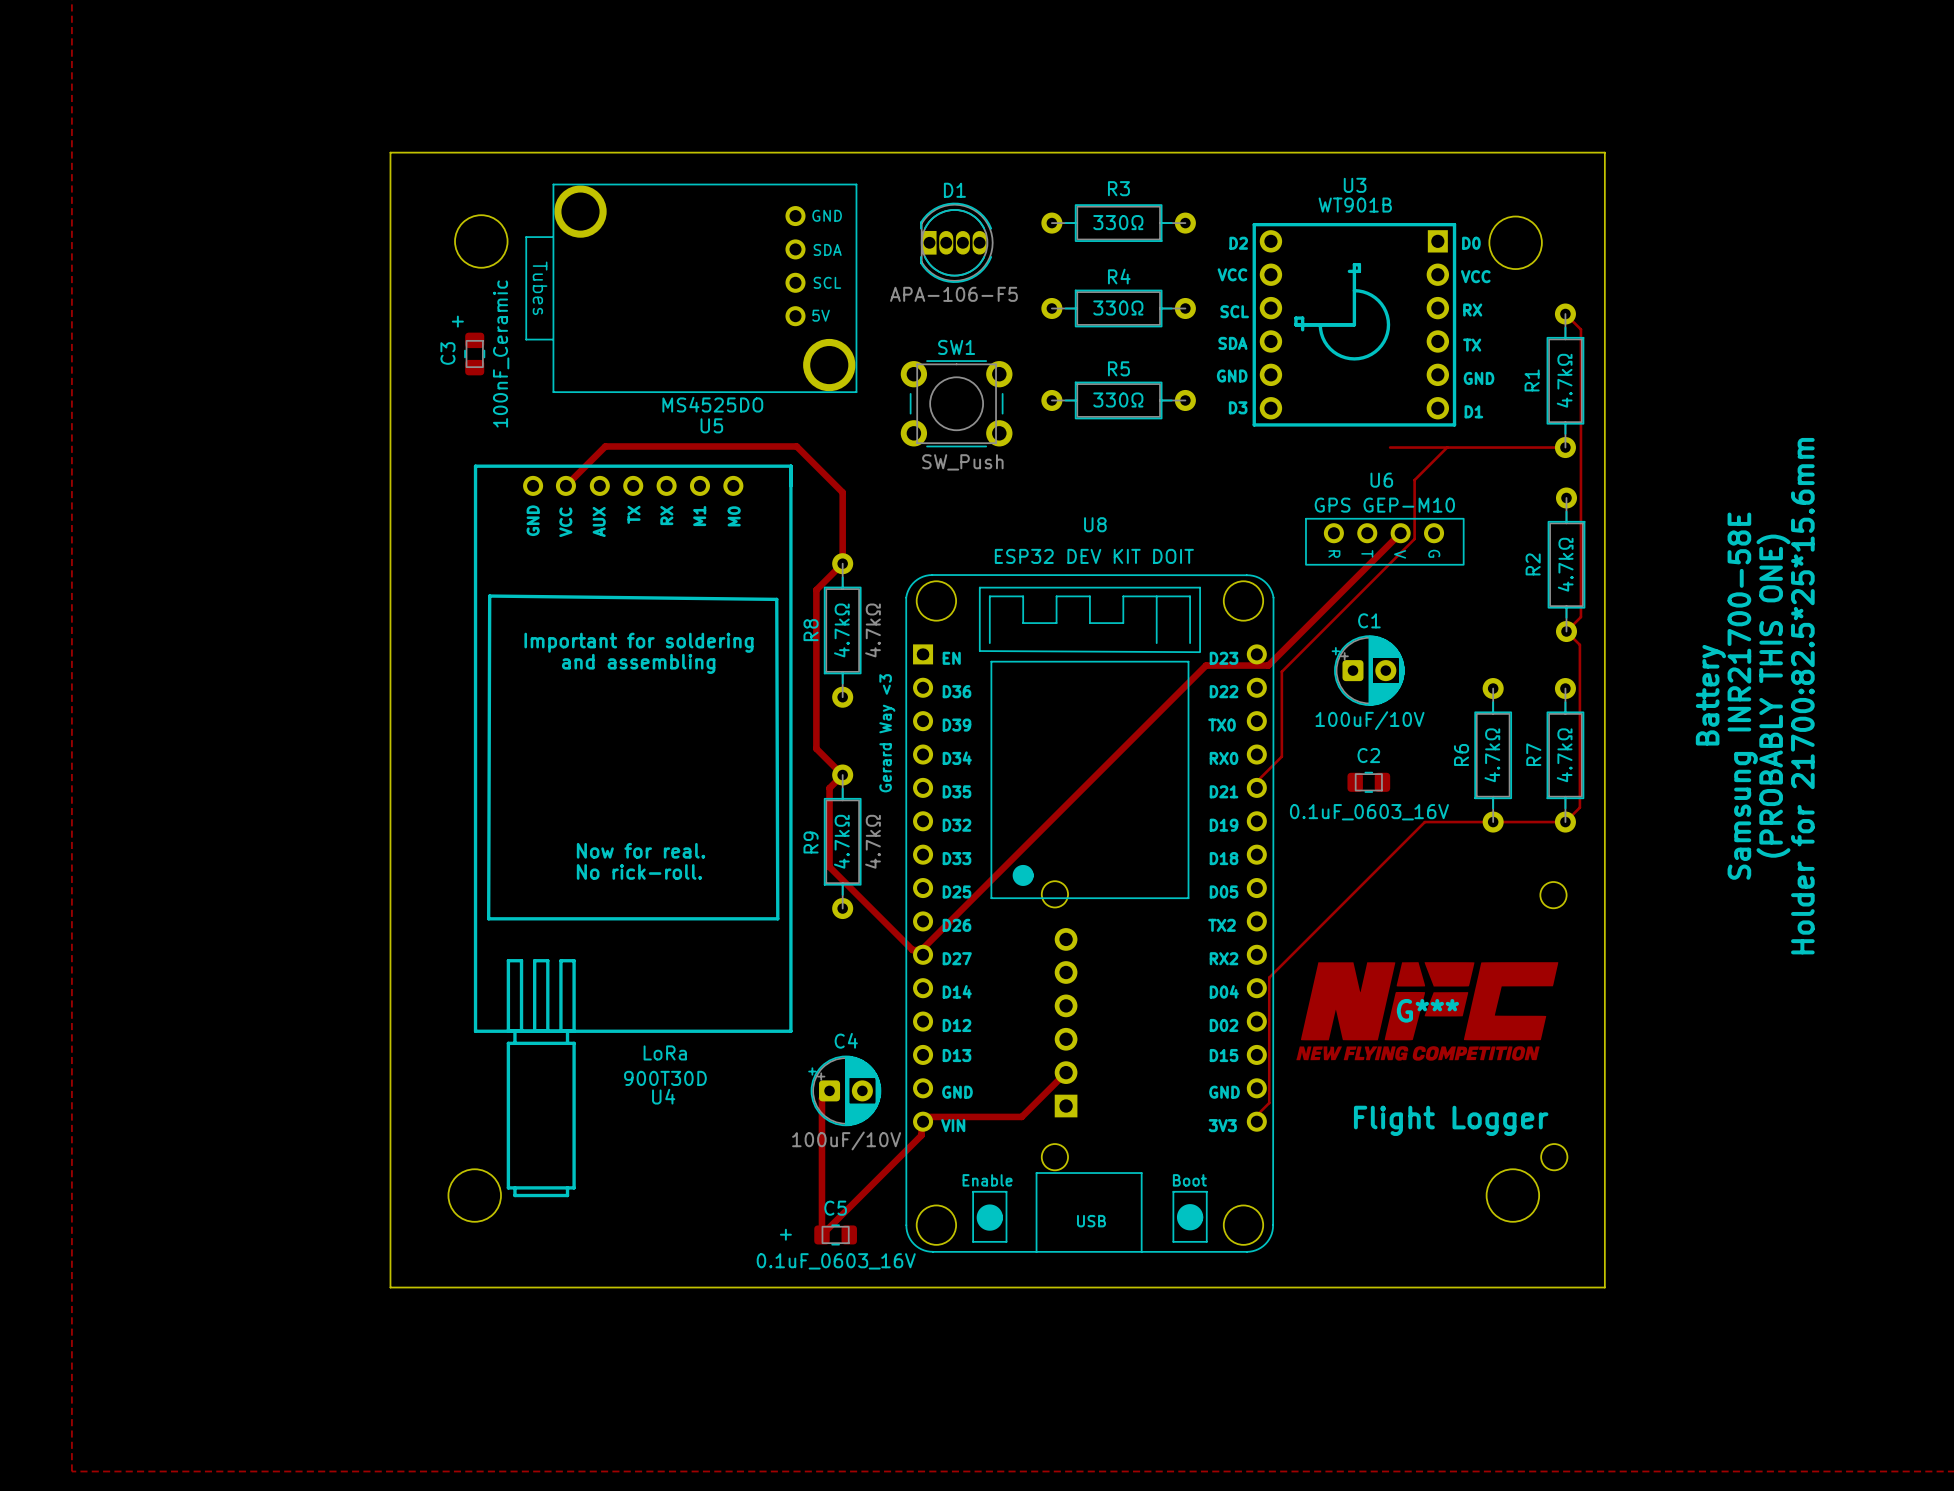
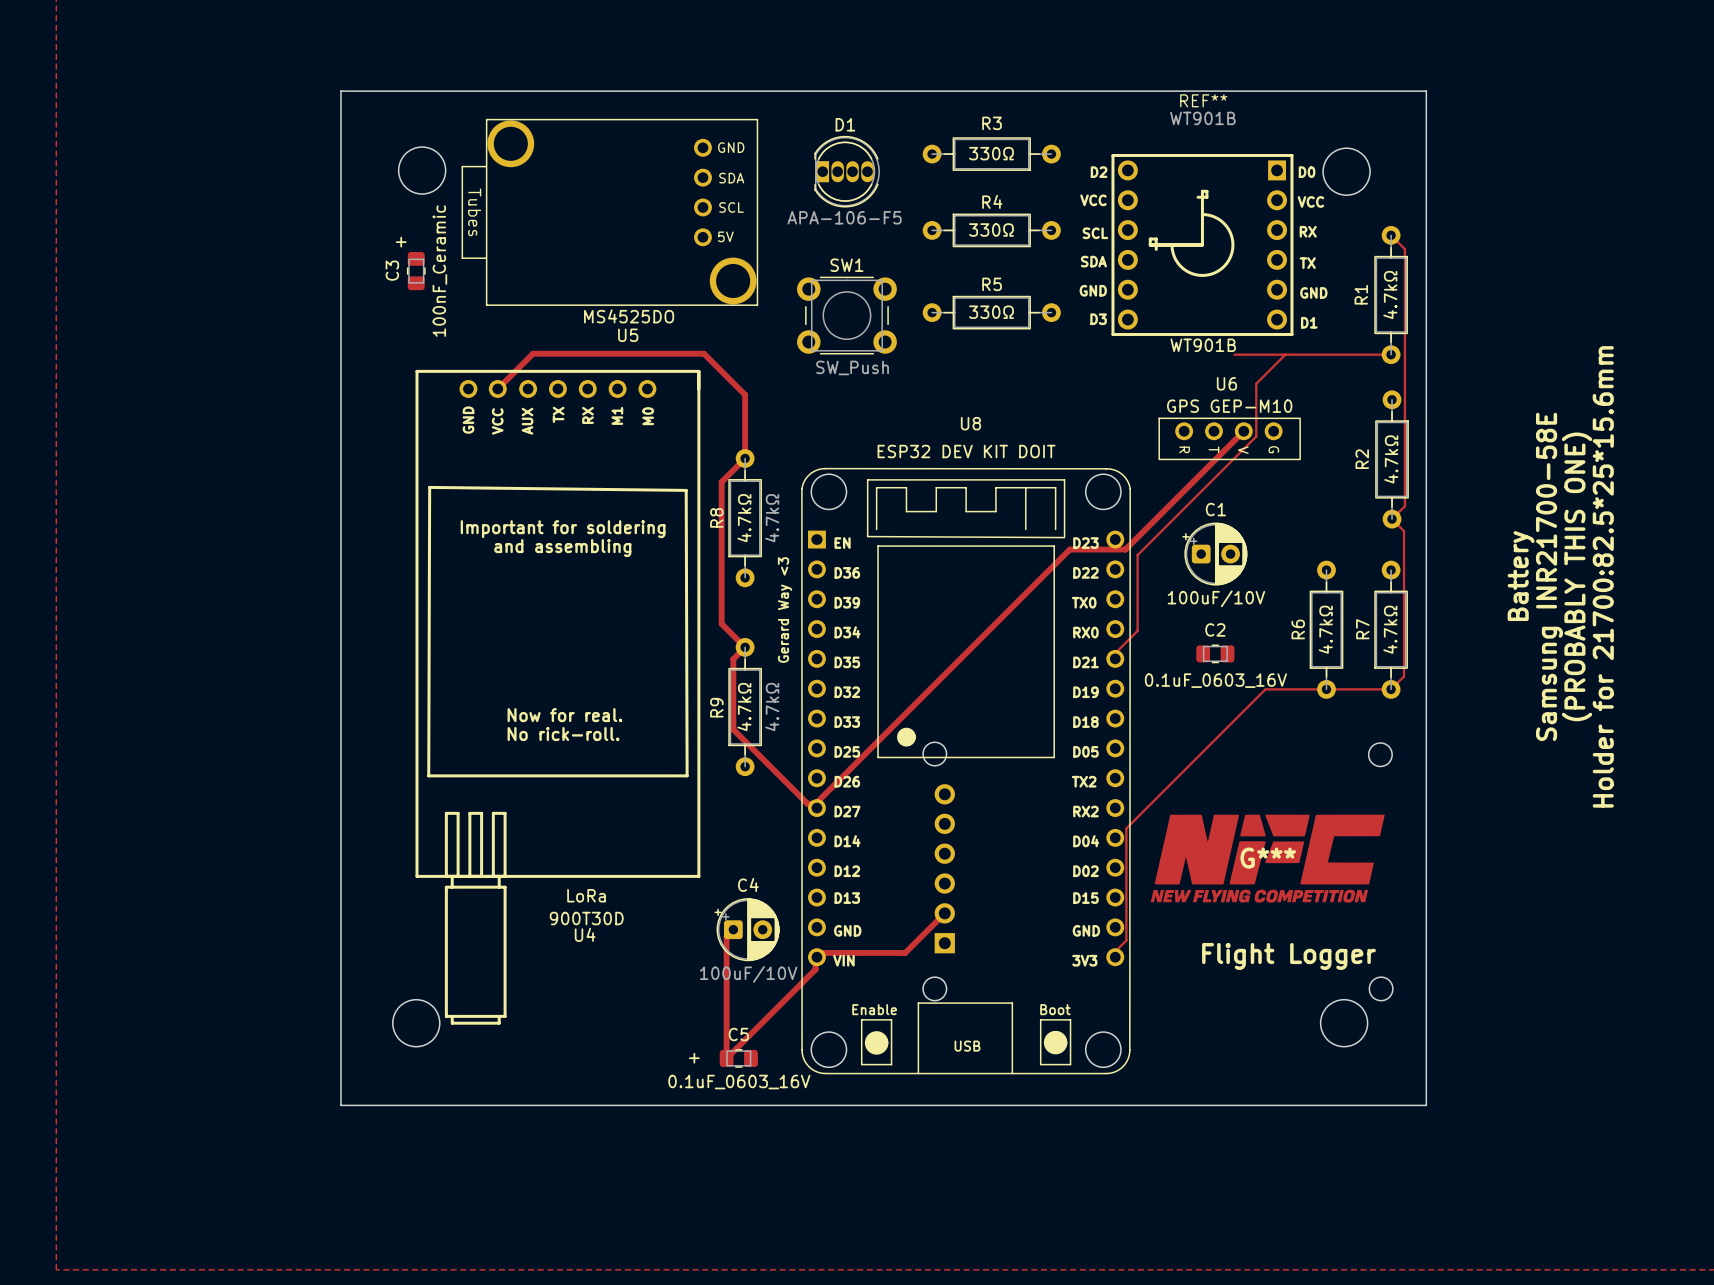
U3 value: none -> WT901B (1202, 118)
U3 name: U3 (1355, 185) -> REF** (1203, 100)
U3 text position: WT901B (1355, 205) -> WT901B (1203, 345)
U8 value: none -> ESP32 DEV KIT DOIT (966, 451)
U8 text: ESP32 DEV KIT DOIT (1094, 556) -> none

